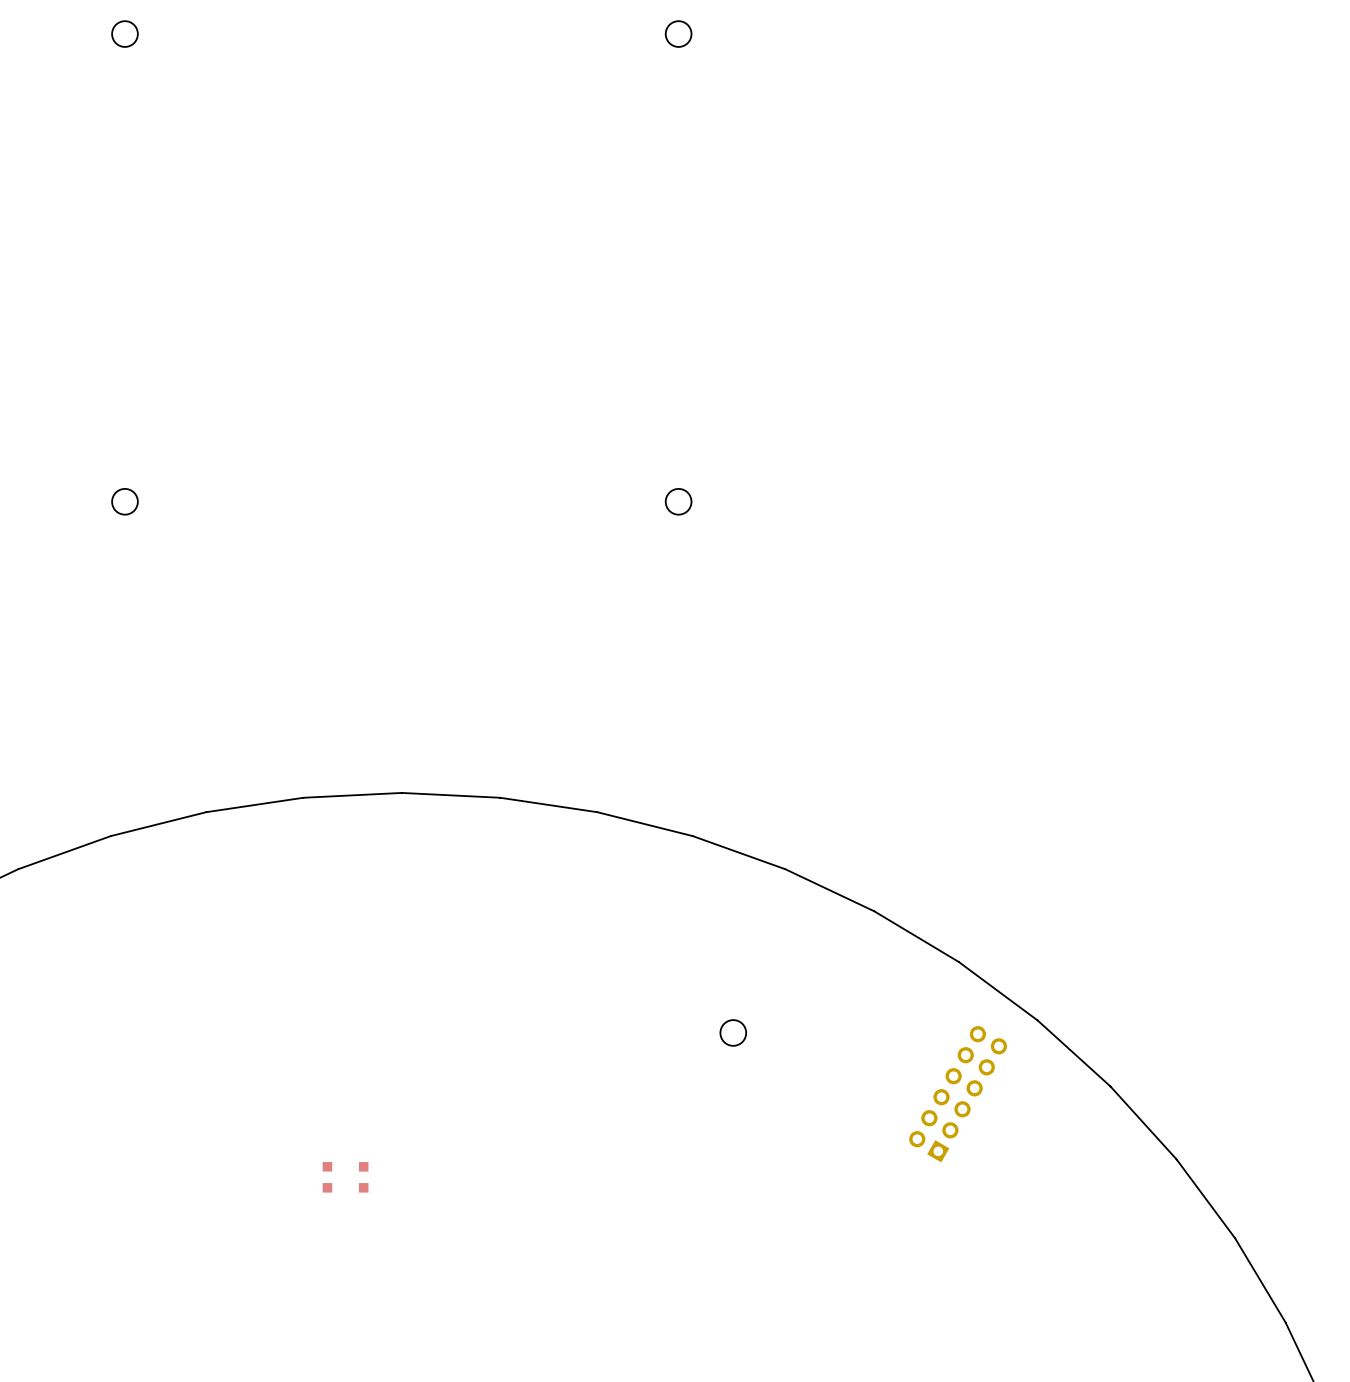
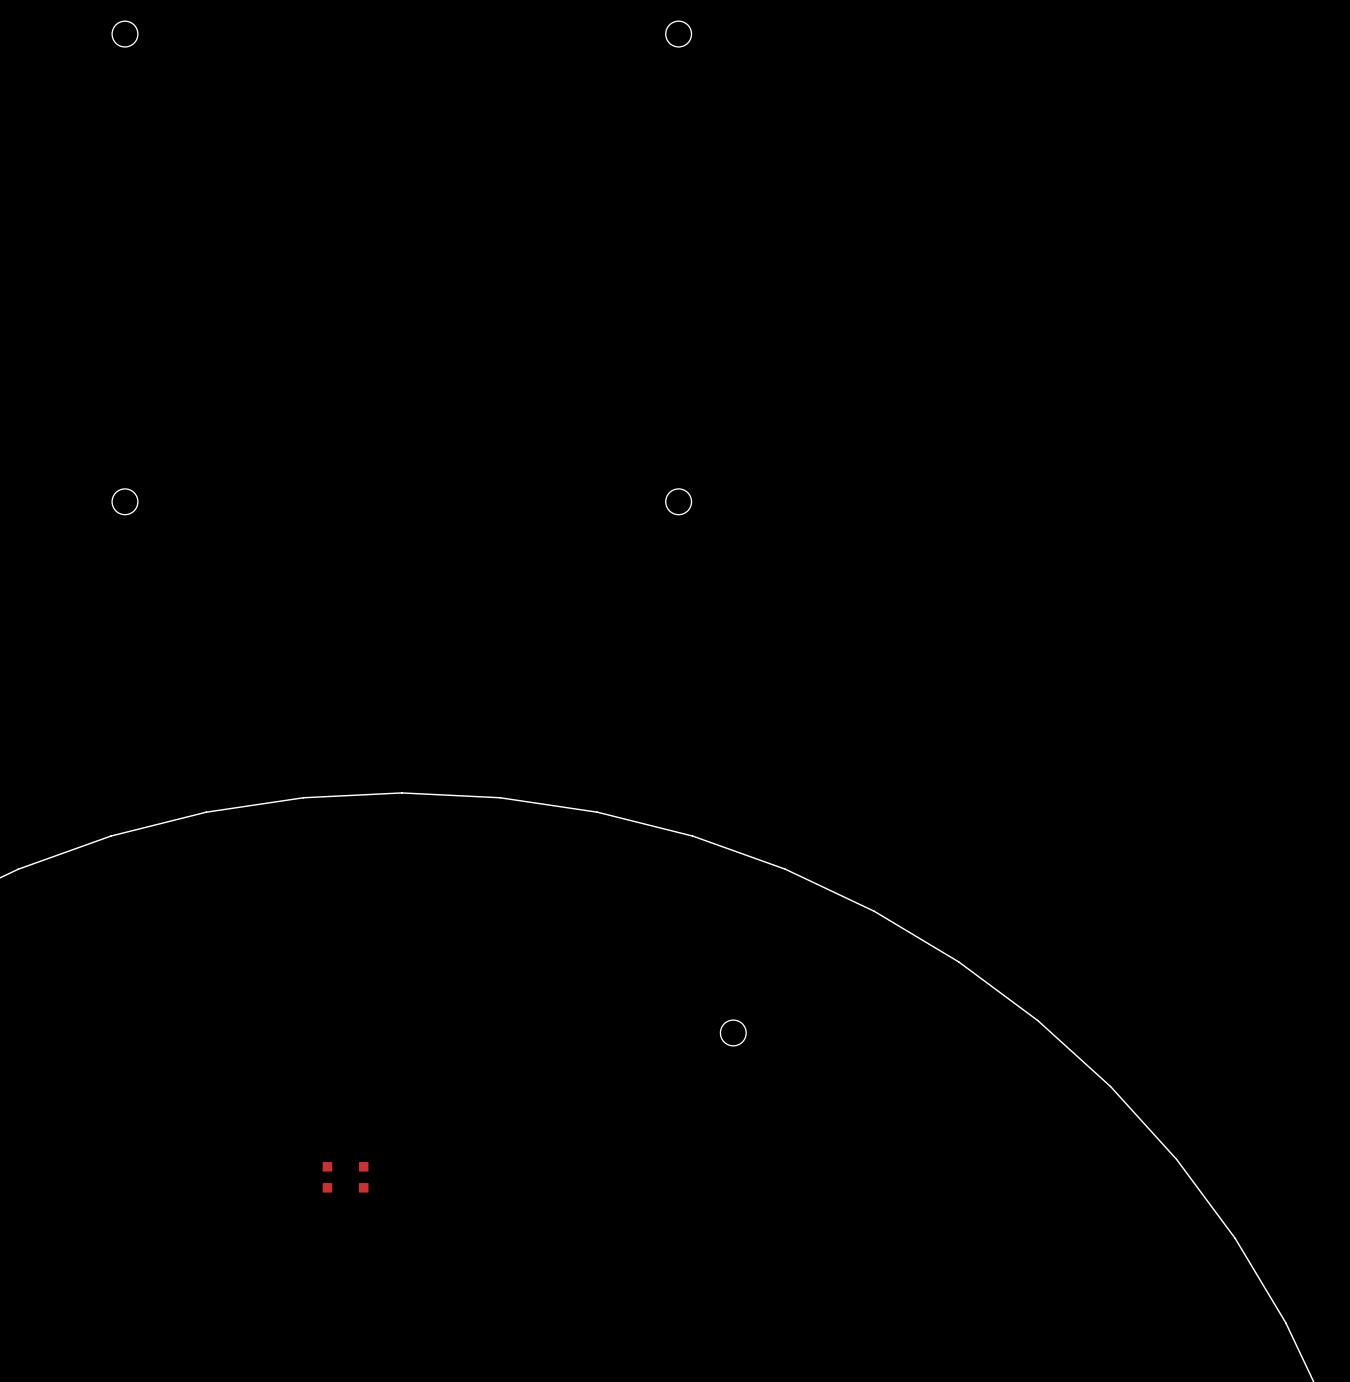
part: (958, 1094) -> none

